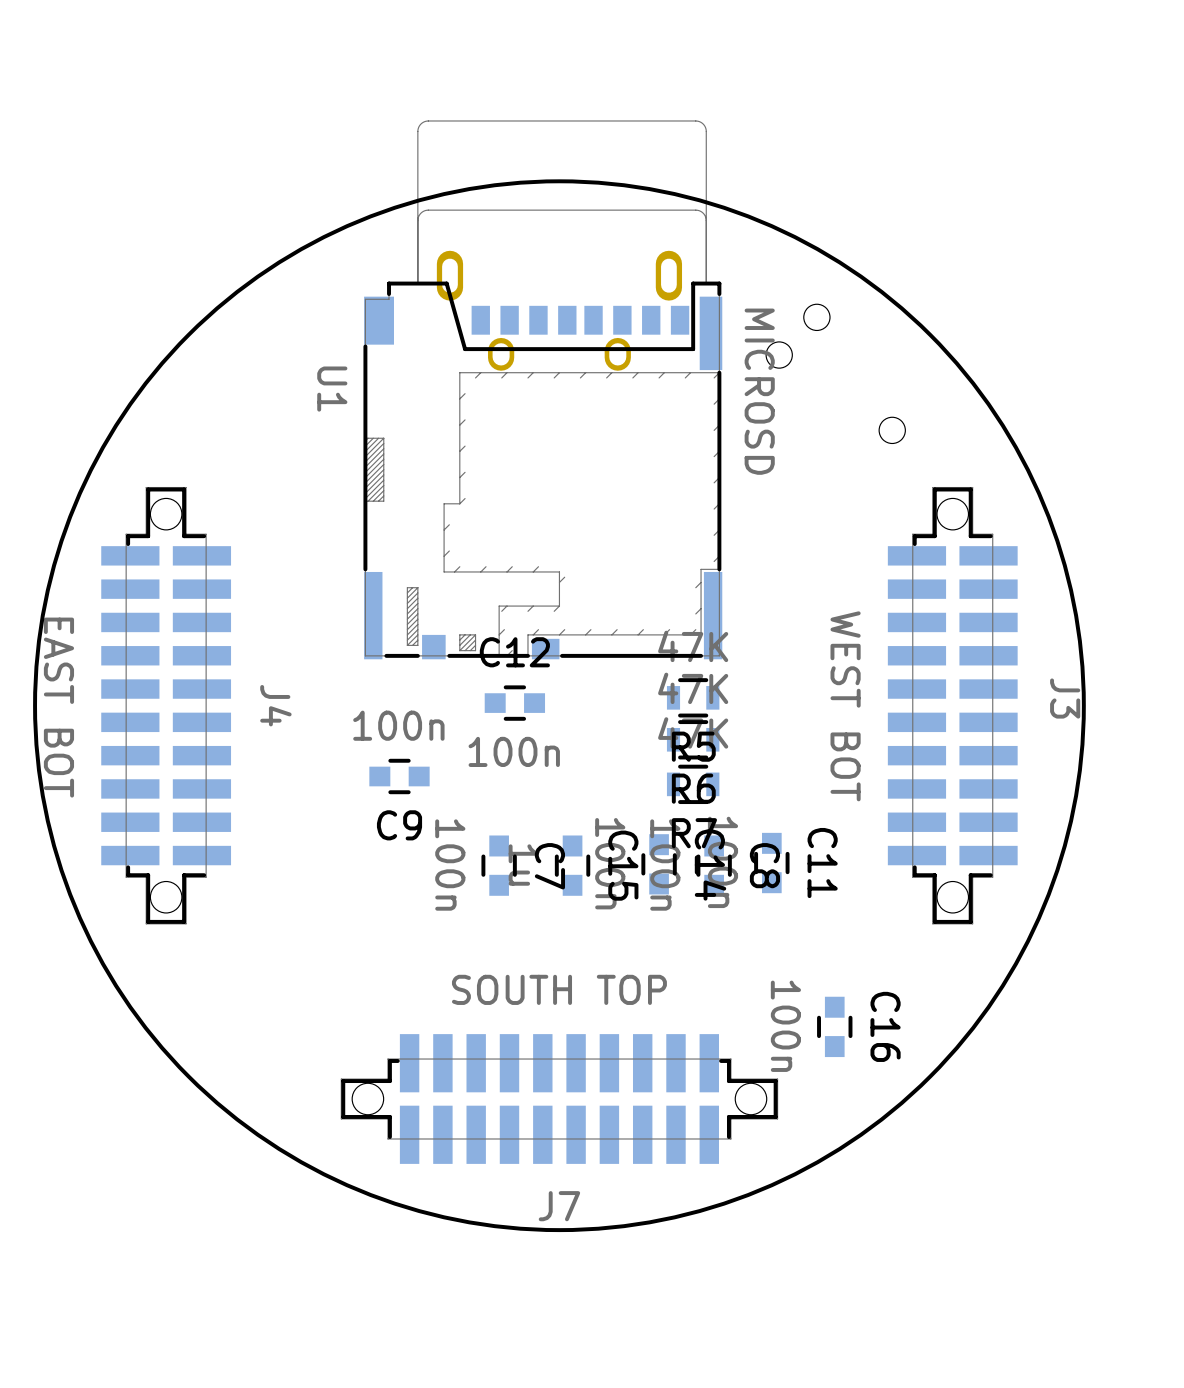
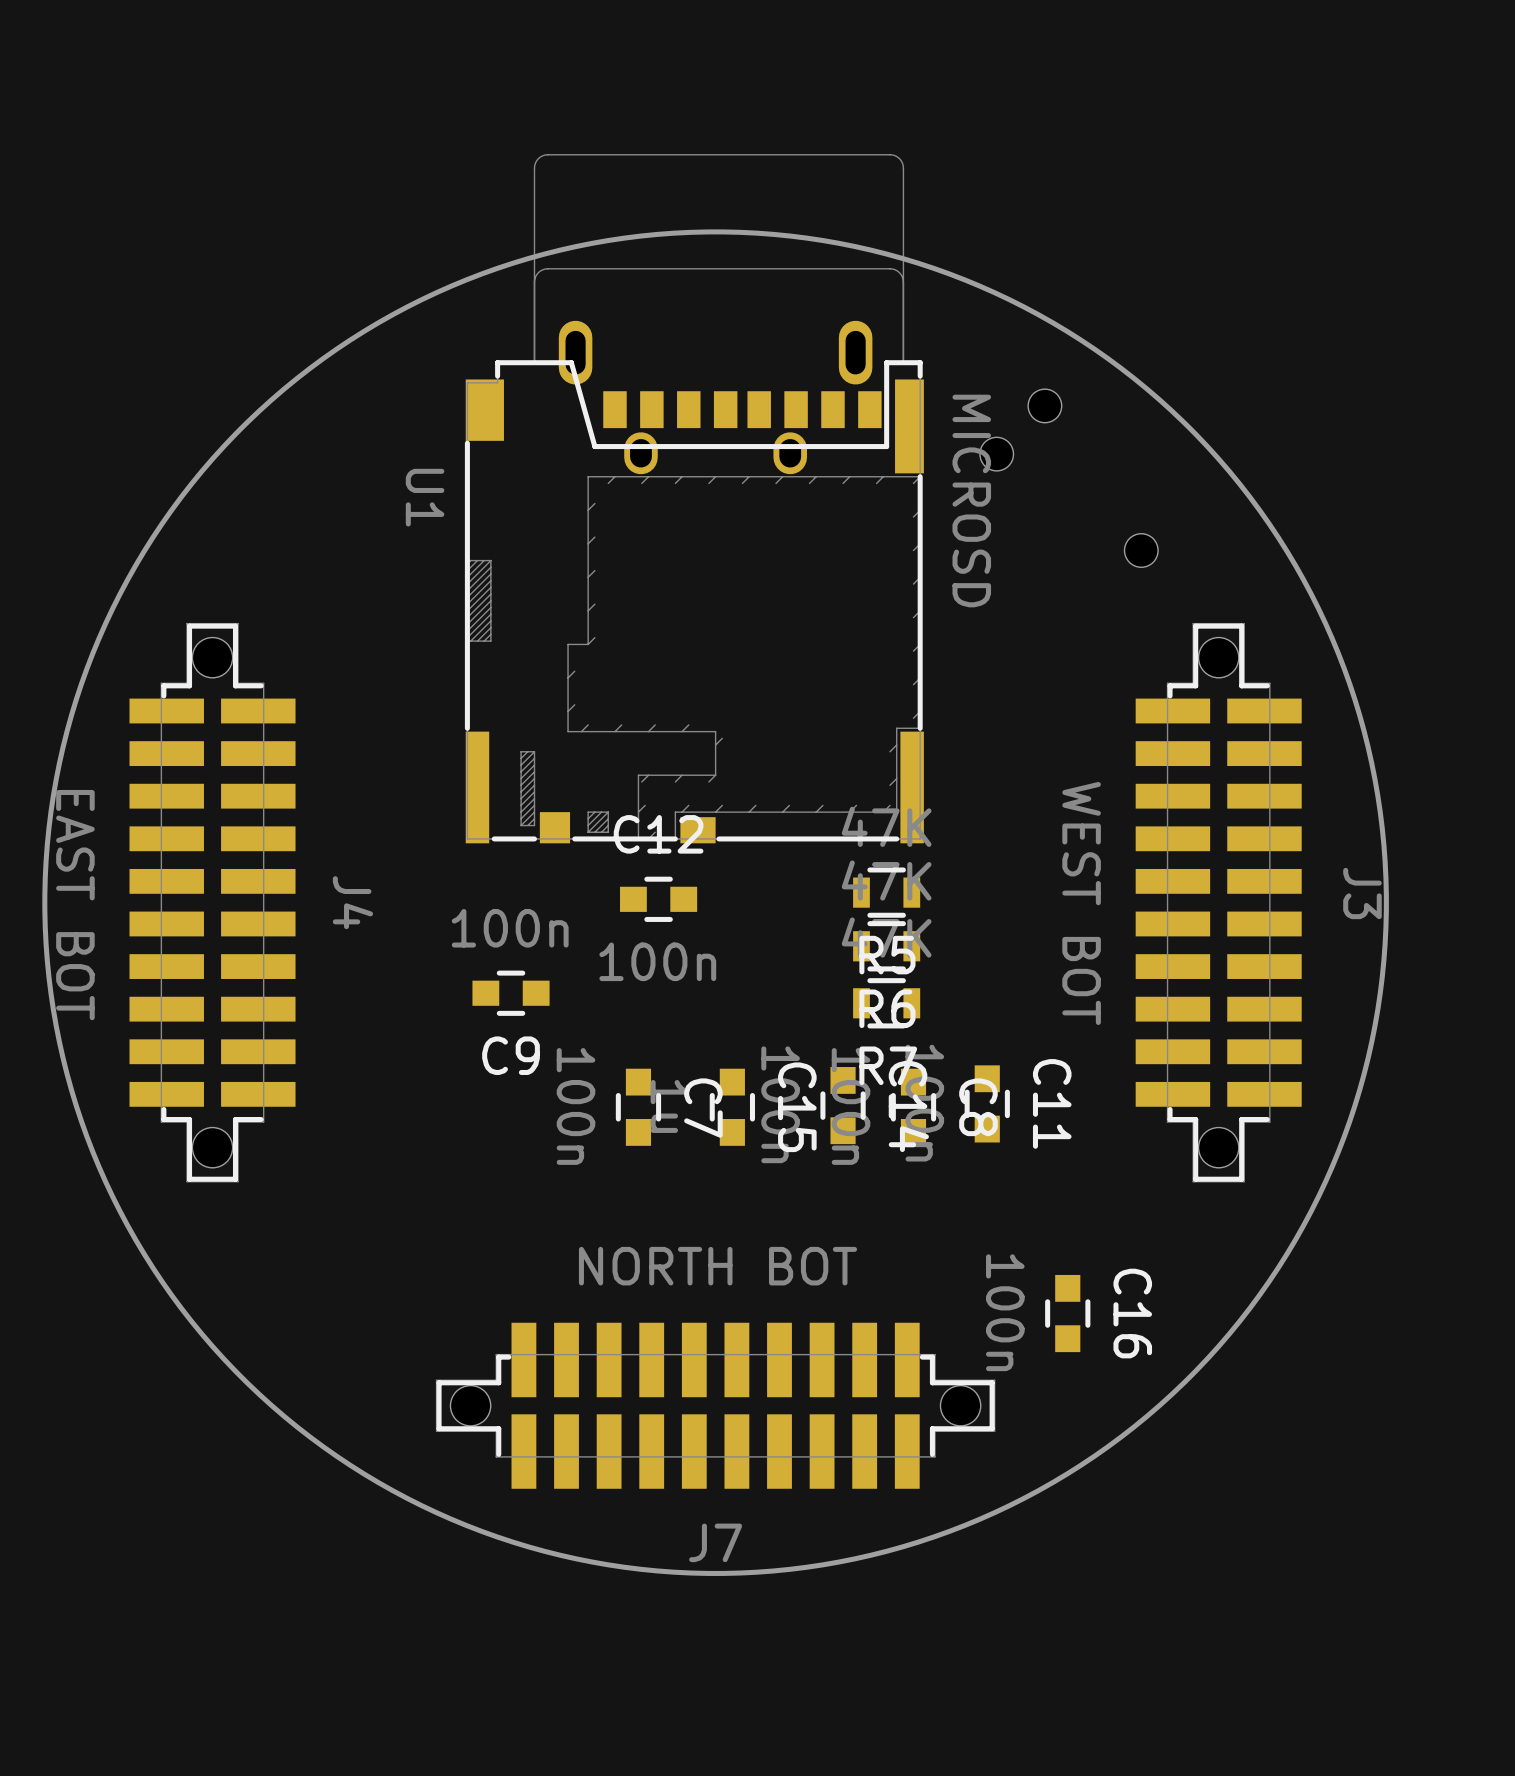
J7 value: SOUTH TOP (559, 989) -> NORTH BOT (717, 1266)

